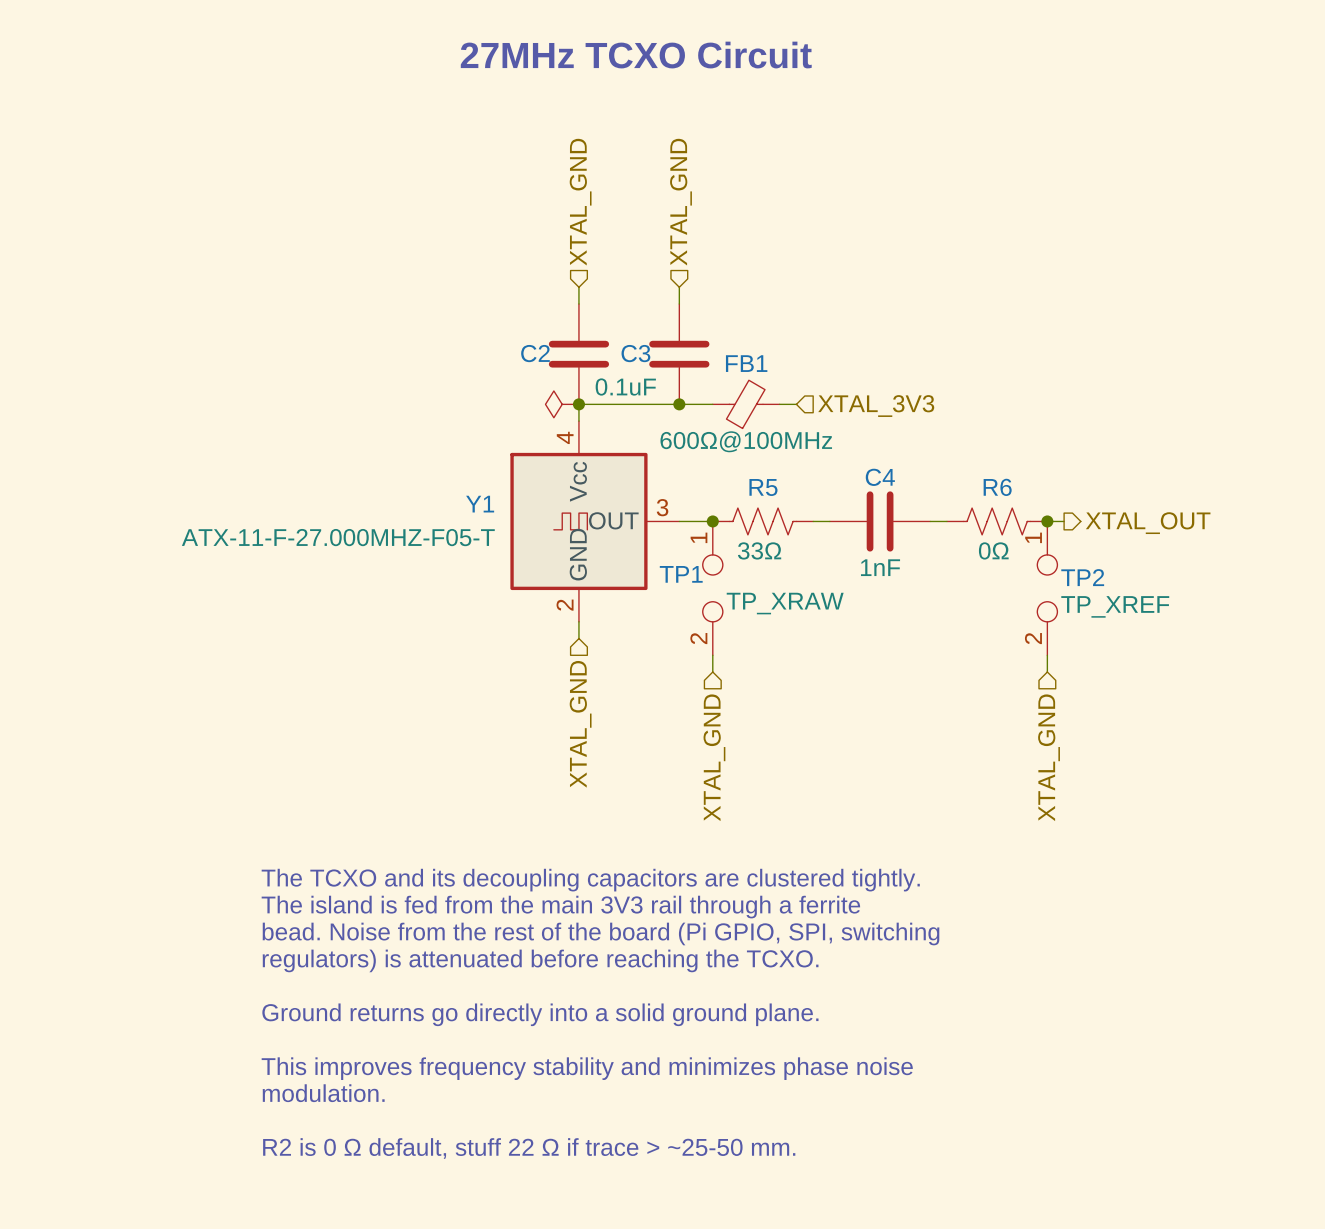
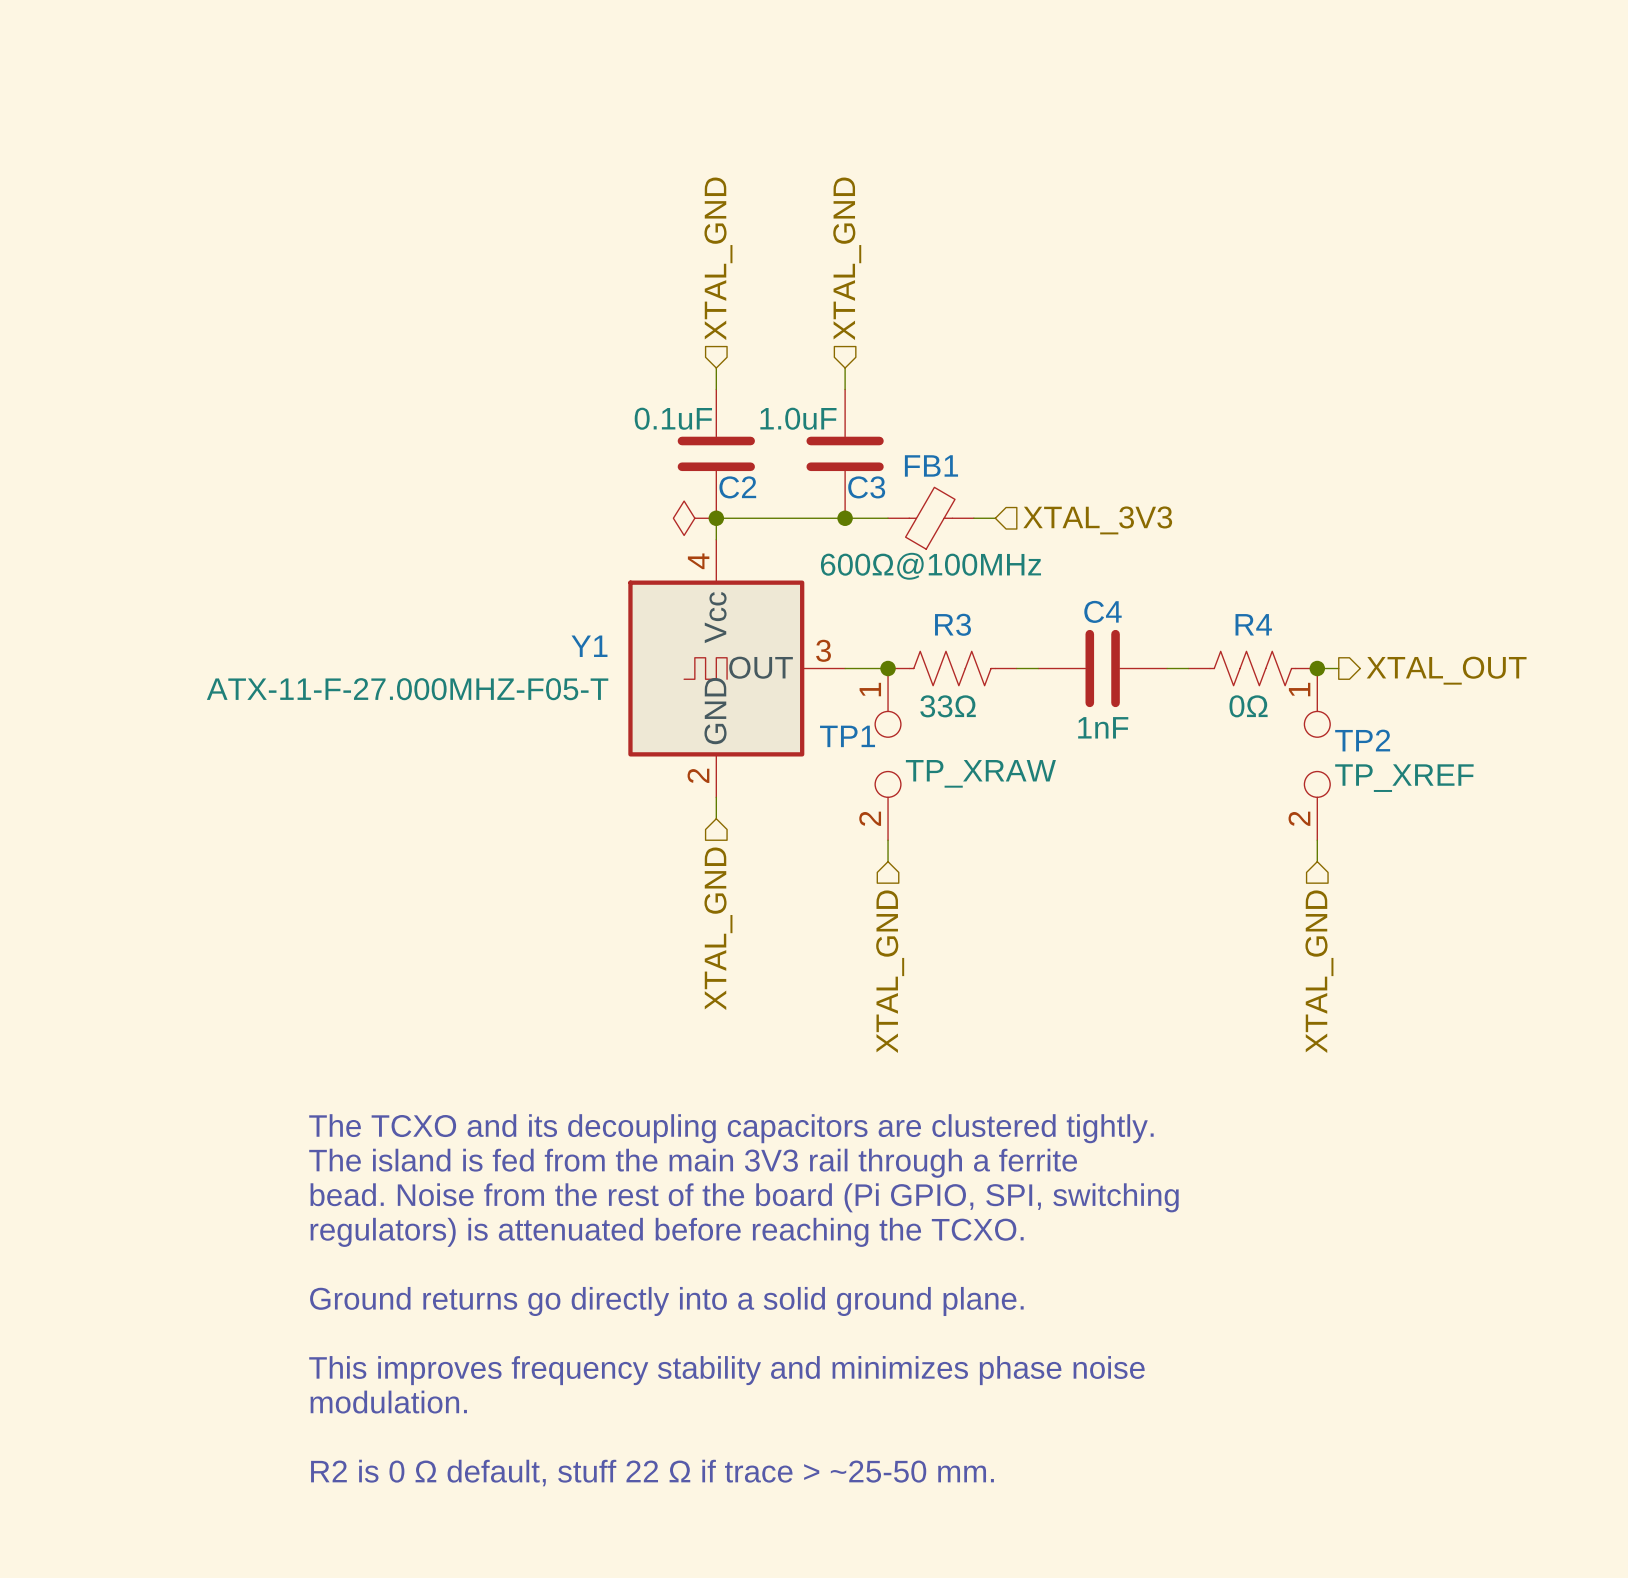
text: 27MHz TCXO Circuit (636, 55) -> none
C3 value: none -> 1.0uF (798, 418)
C2 name position: C2 (535, 353) -> C2 (737, 487)
C3 name position: C3 (635, 353) -> C3 (866, 487)
C2 value position: 0.1uF (625, 387) -> 0.1uF (673, 418)
R5 name: R5 (763, 487) -> R3 (953, 624)
R6 name: R6 (997, 487) -> R4 (1253, 624)

